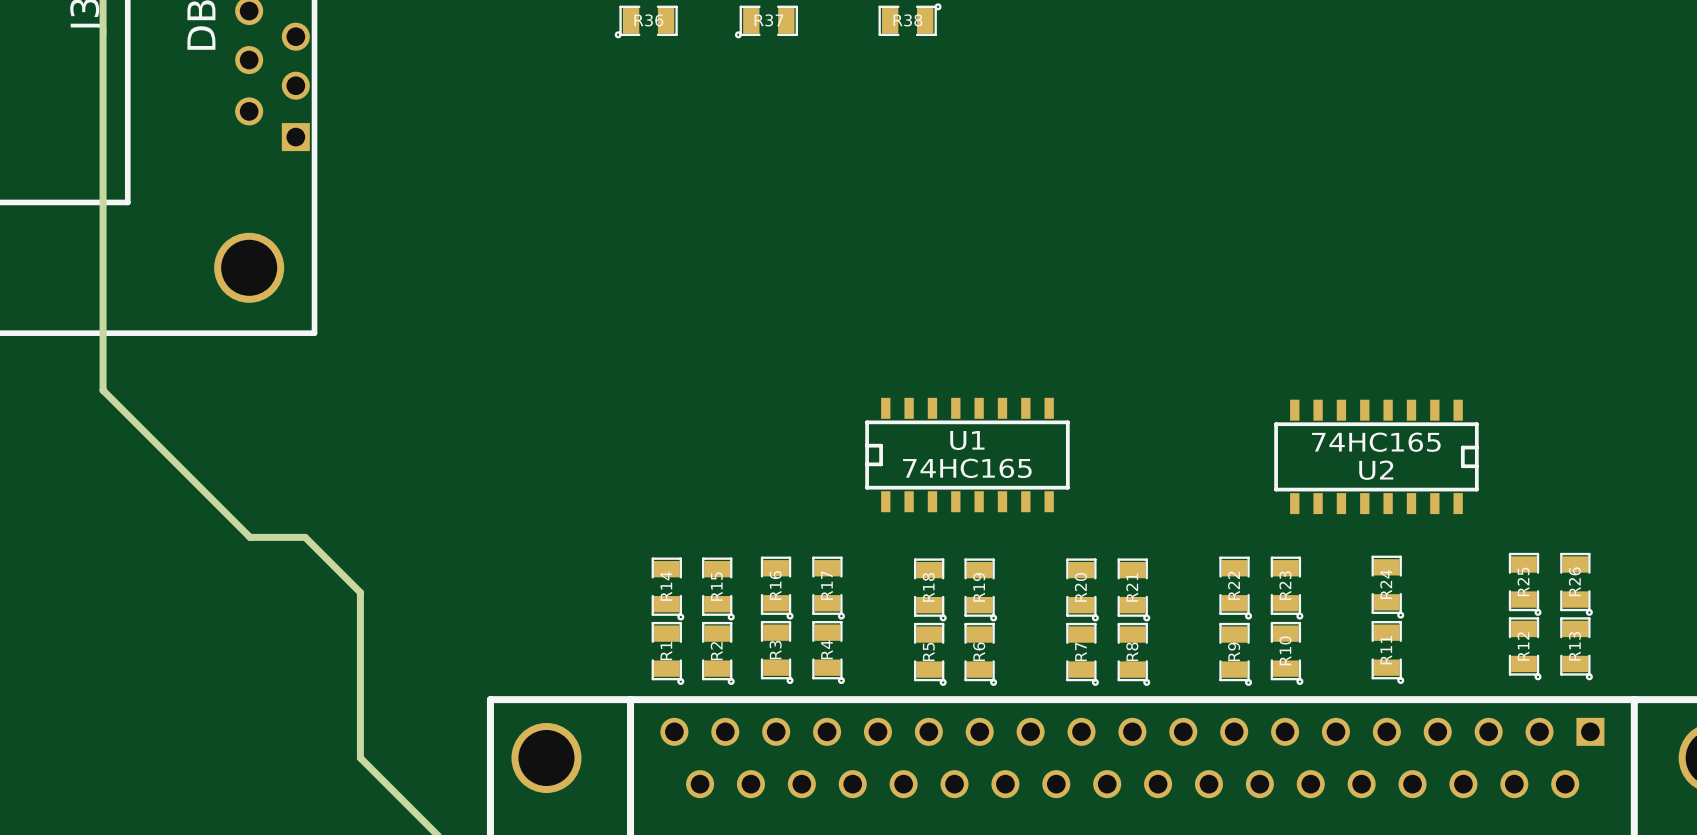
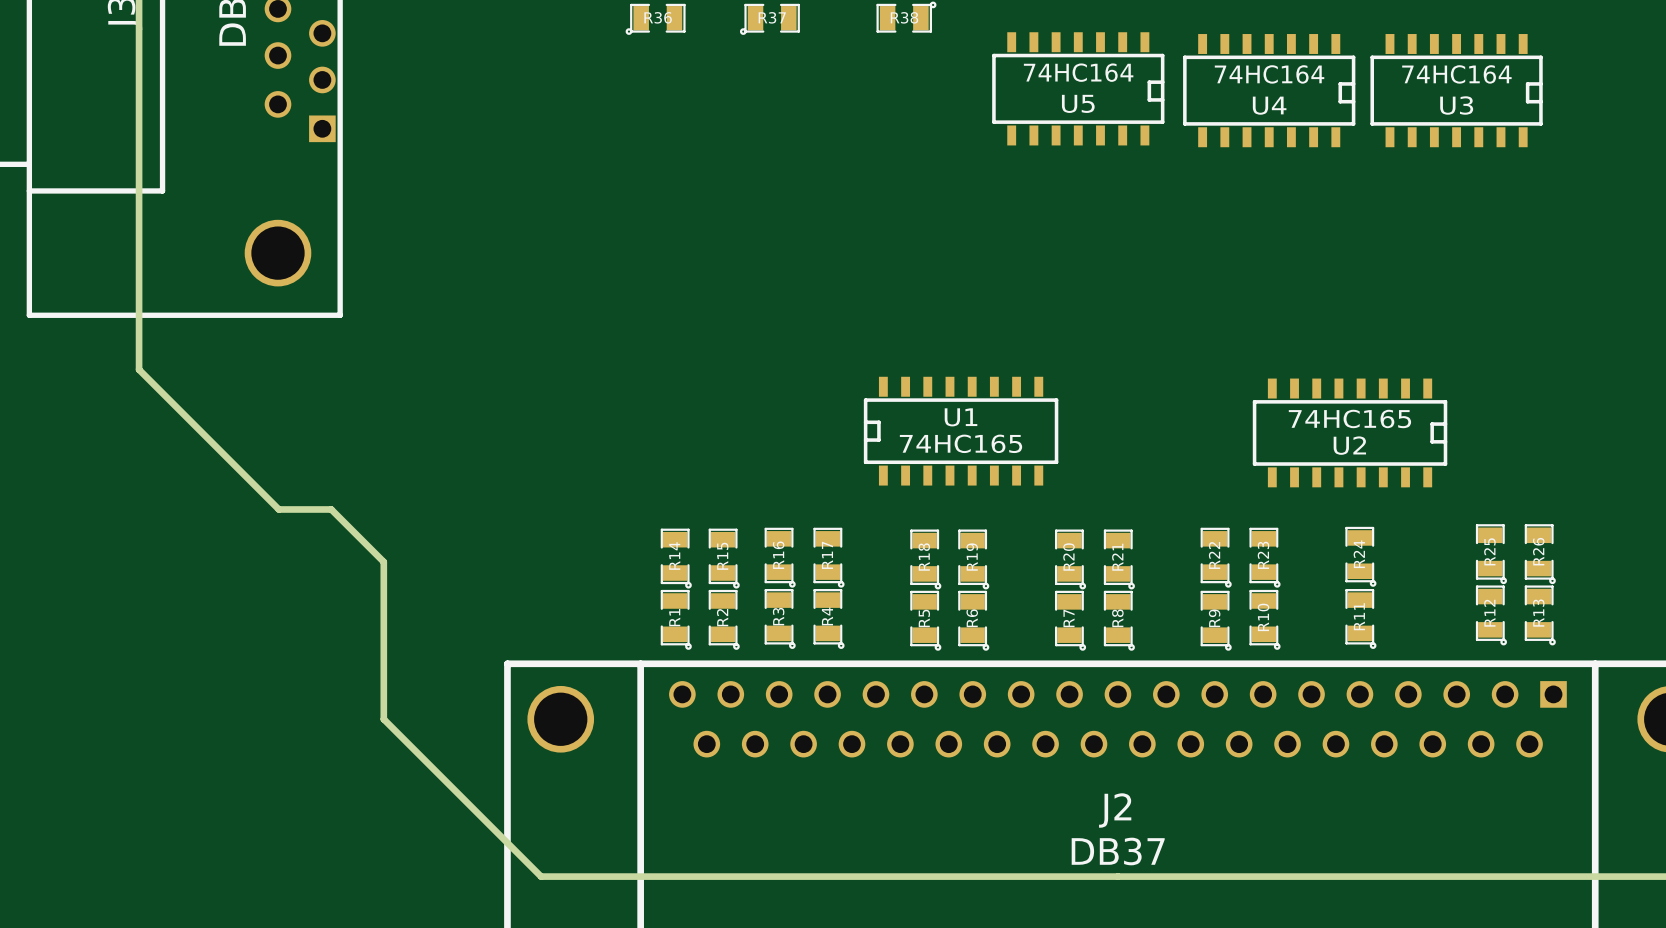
U5: none -> 74HC164 (1078, 88)
U4: none -> 74HC164 (1269, 90)
U3: none -> 74HC164 (1456, 90)

